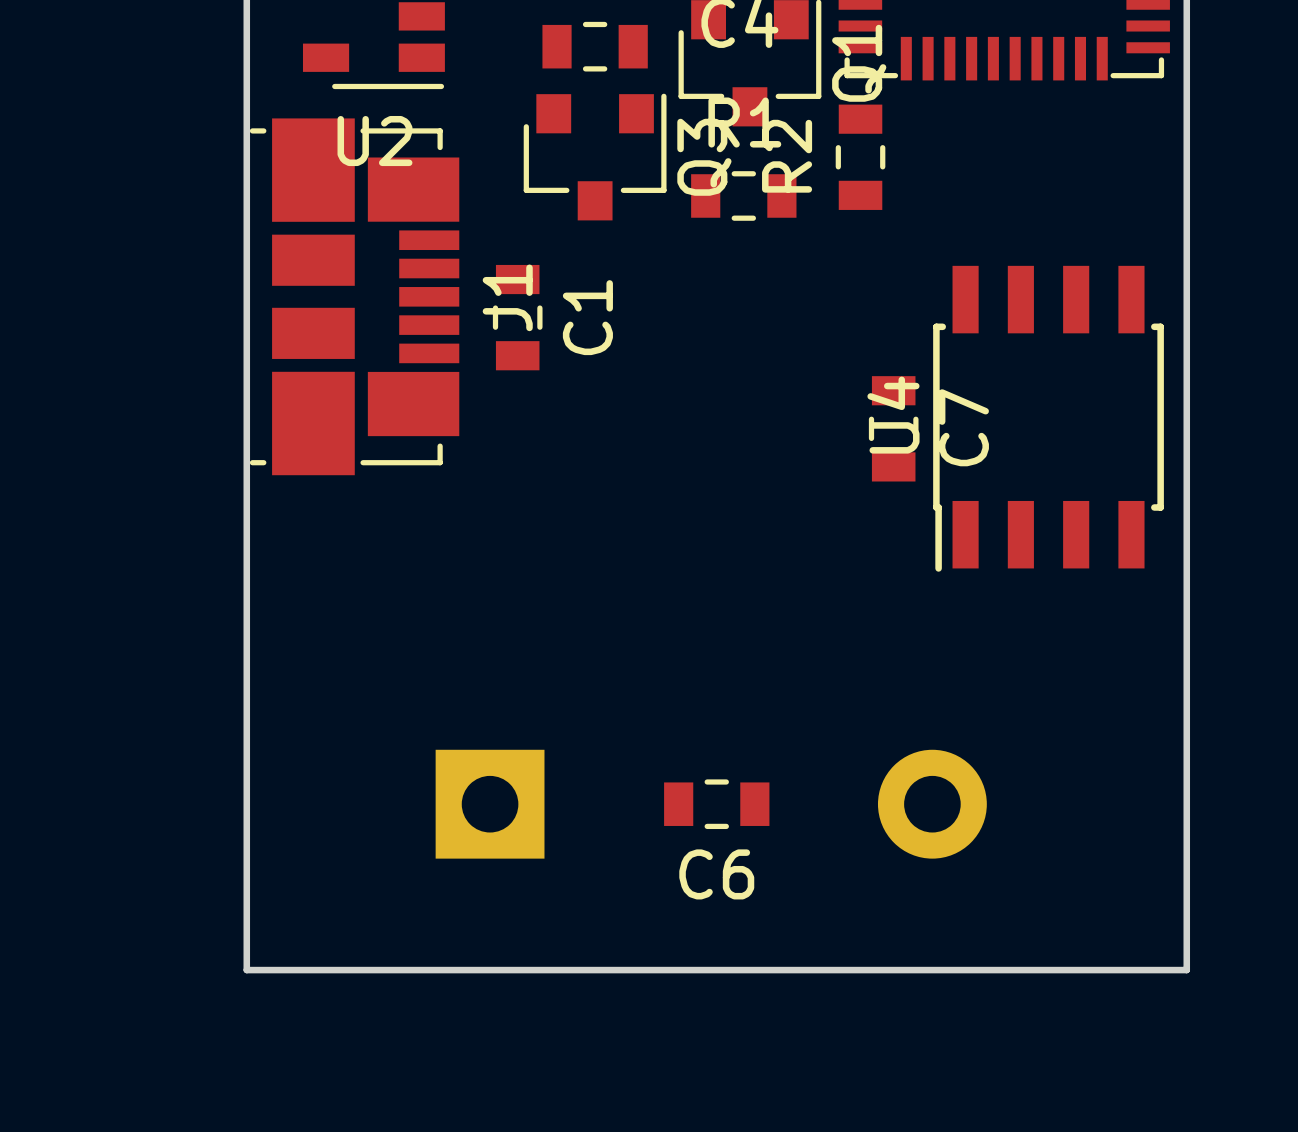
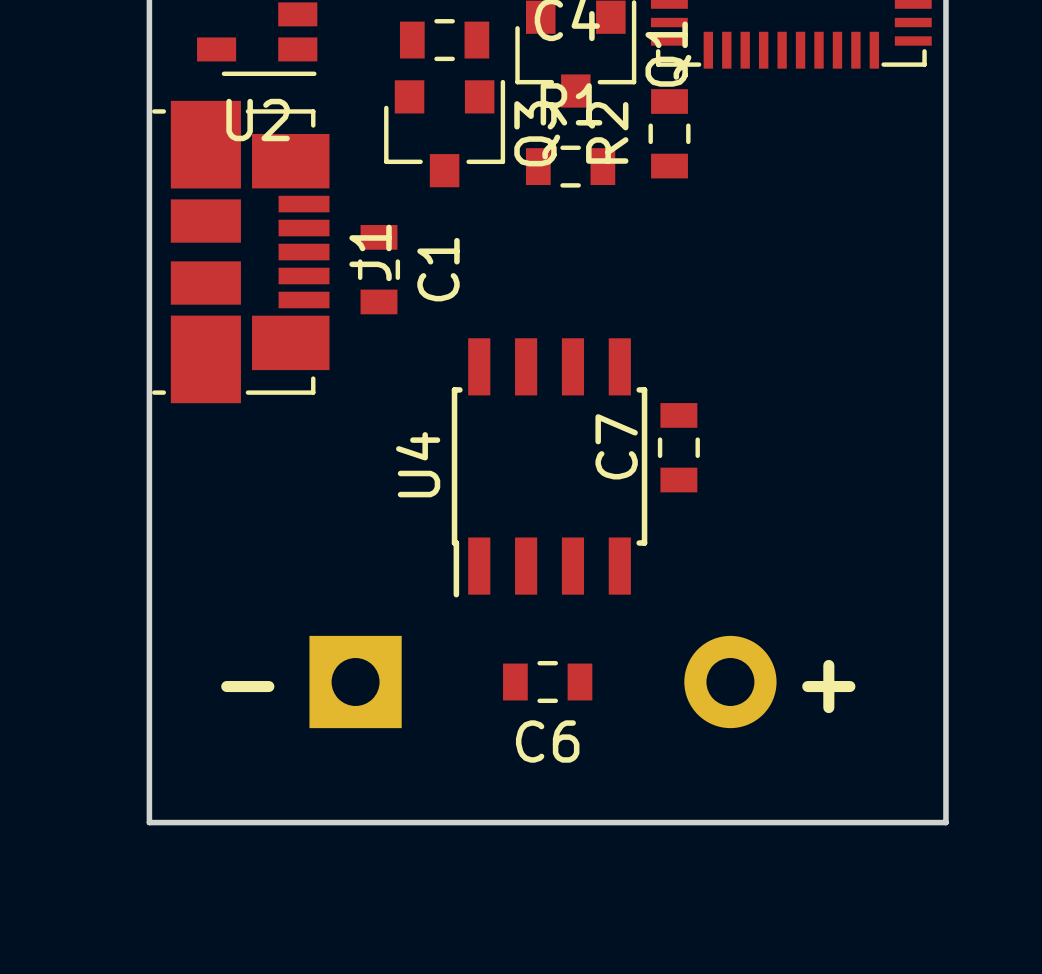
U4 position: (1048, 418) -> (549, 467)
C7 name position: C7 (963, 427) -> C7 (616, 446)
C7 position: (893, 428) -> (678, 447)
text: none -> - (247, 686)
text: none -> + (828, 686)

